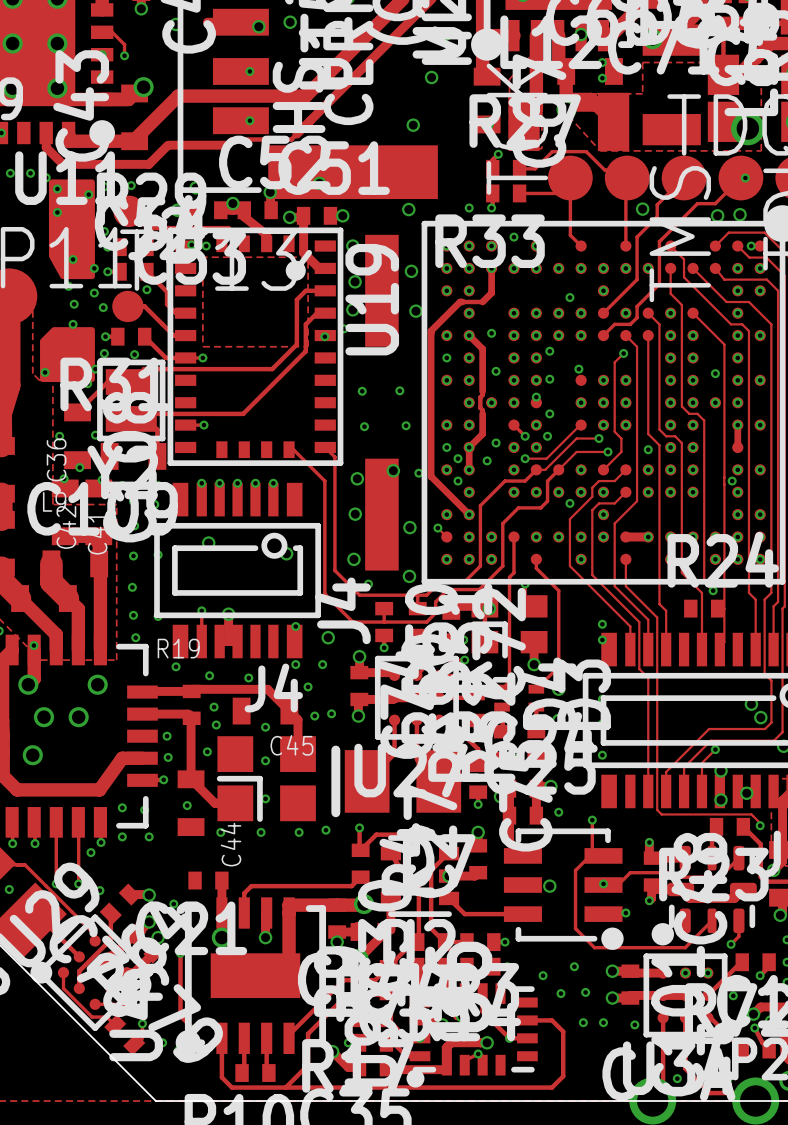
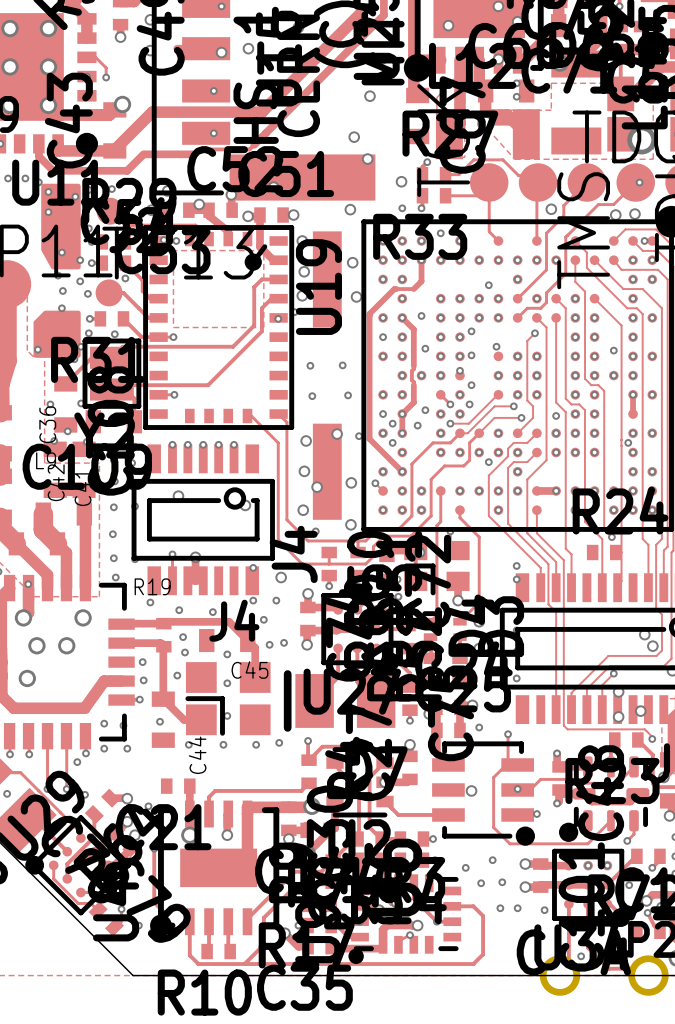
via: none -> (367, 159)
via: none -> (401, 181)
via: none -> (317, 487)

